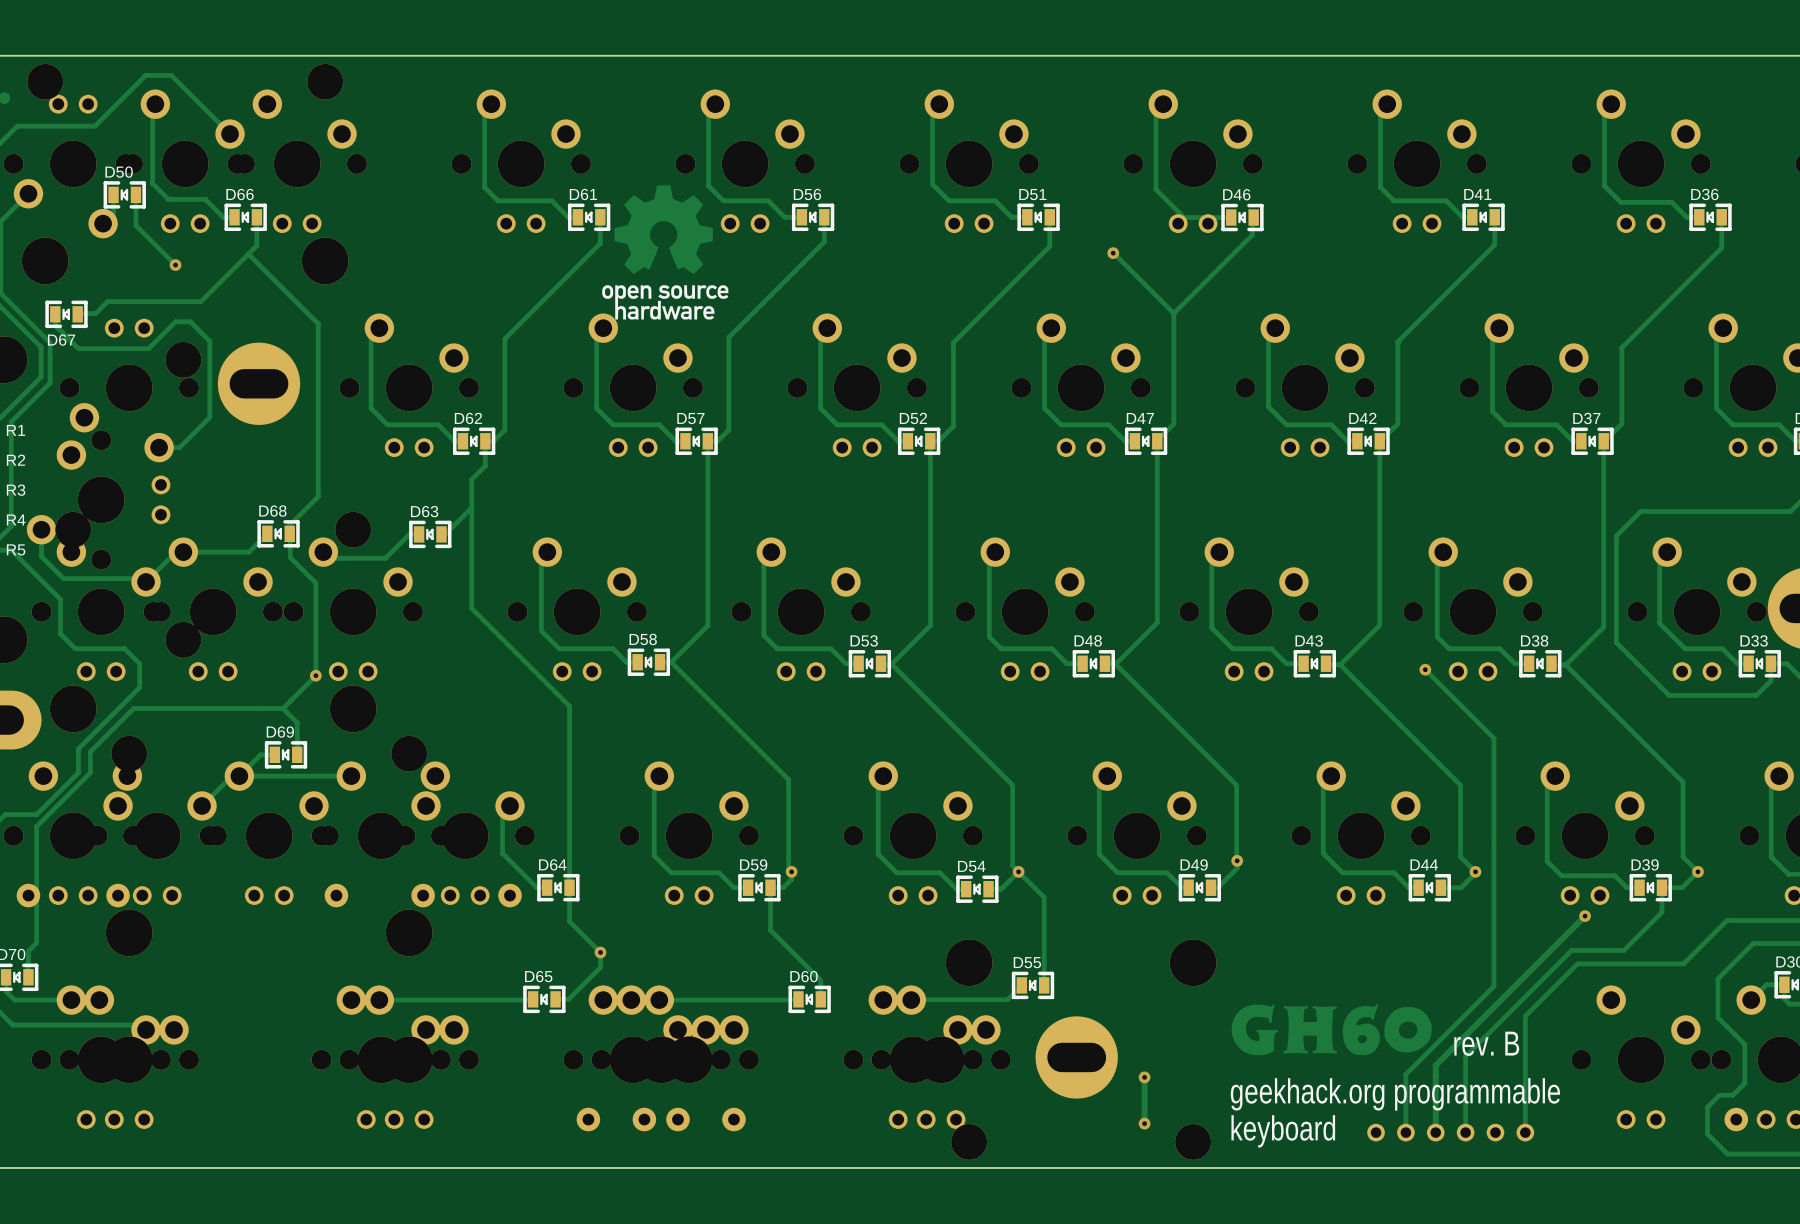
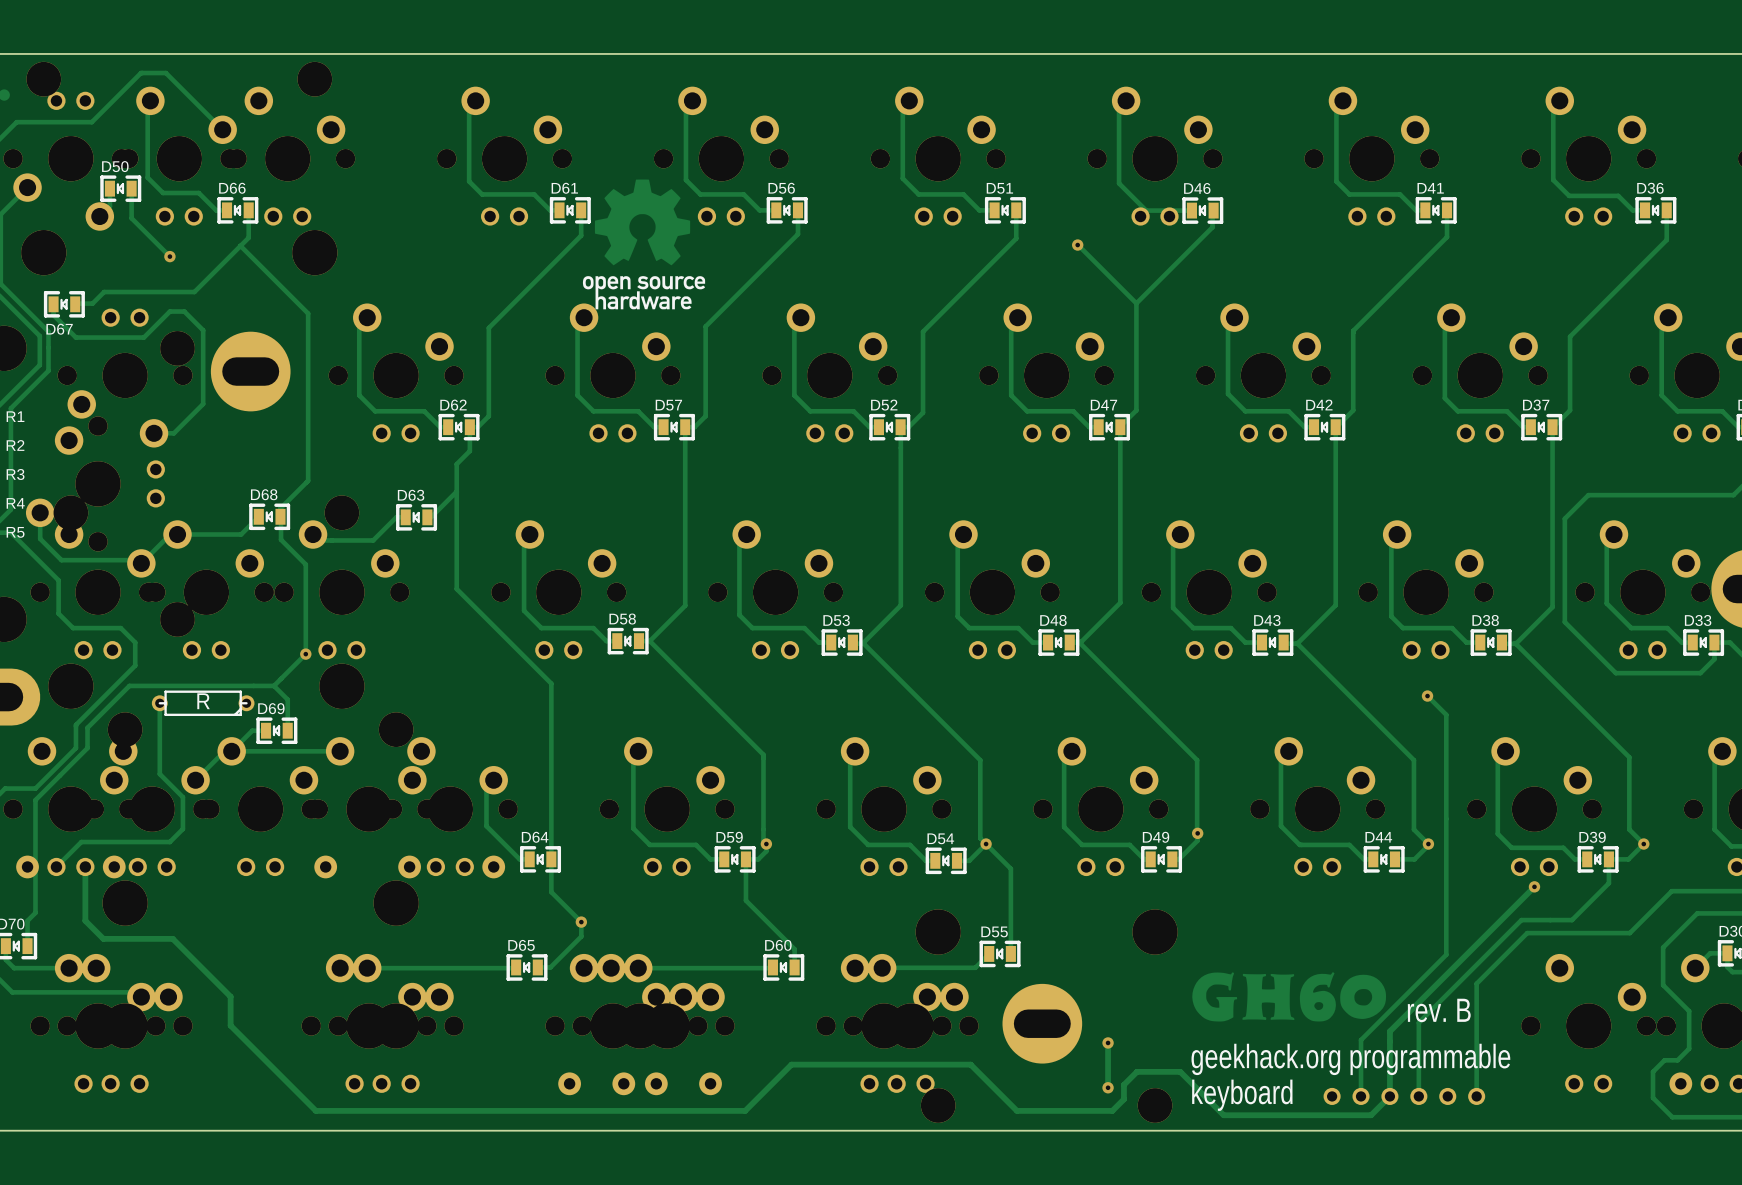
track: (1425, 669) (1474, 718) -> none
via position: (1425, 669) -> (1427, 696)
track: none -> (159, 703) (159, 774) (182, 797) (182, 829) (169, 842) (81, 842) (56, 866)
part: none -> R (203, 703)
track: none -> (85, 866) (85, 920) (103, 938) (172, 938) (230, 996) (230, 1025) (315, 1110) (745, 1110) (791, 1064) (970, 1064) (1016, 1110) (1112, 1110) (1123, 1099) (1123, 1084) (1136, 1071) (1180, 1071) (1223, 1115) (1371, 1115) (1389, 1096)

